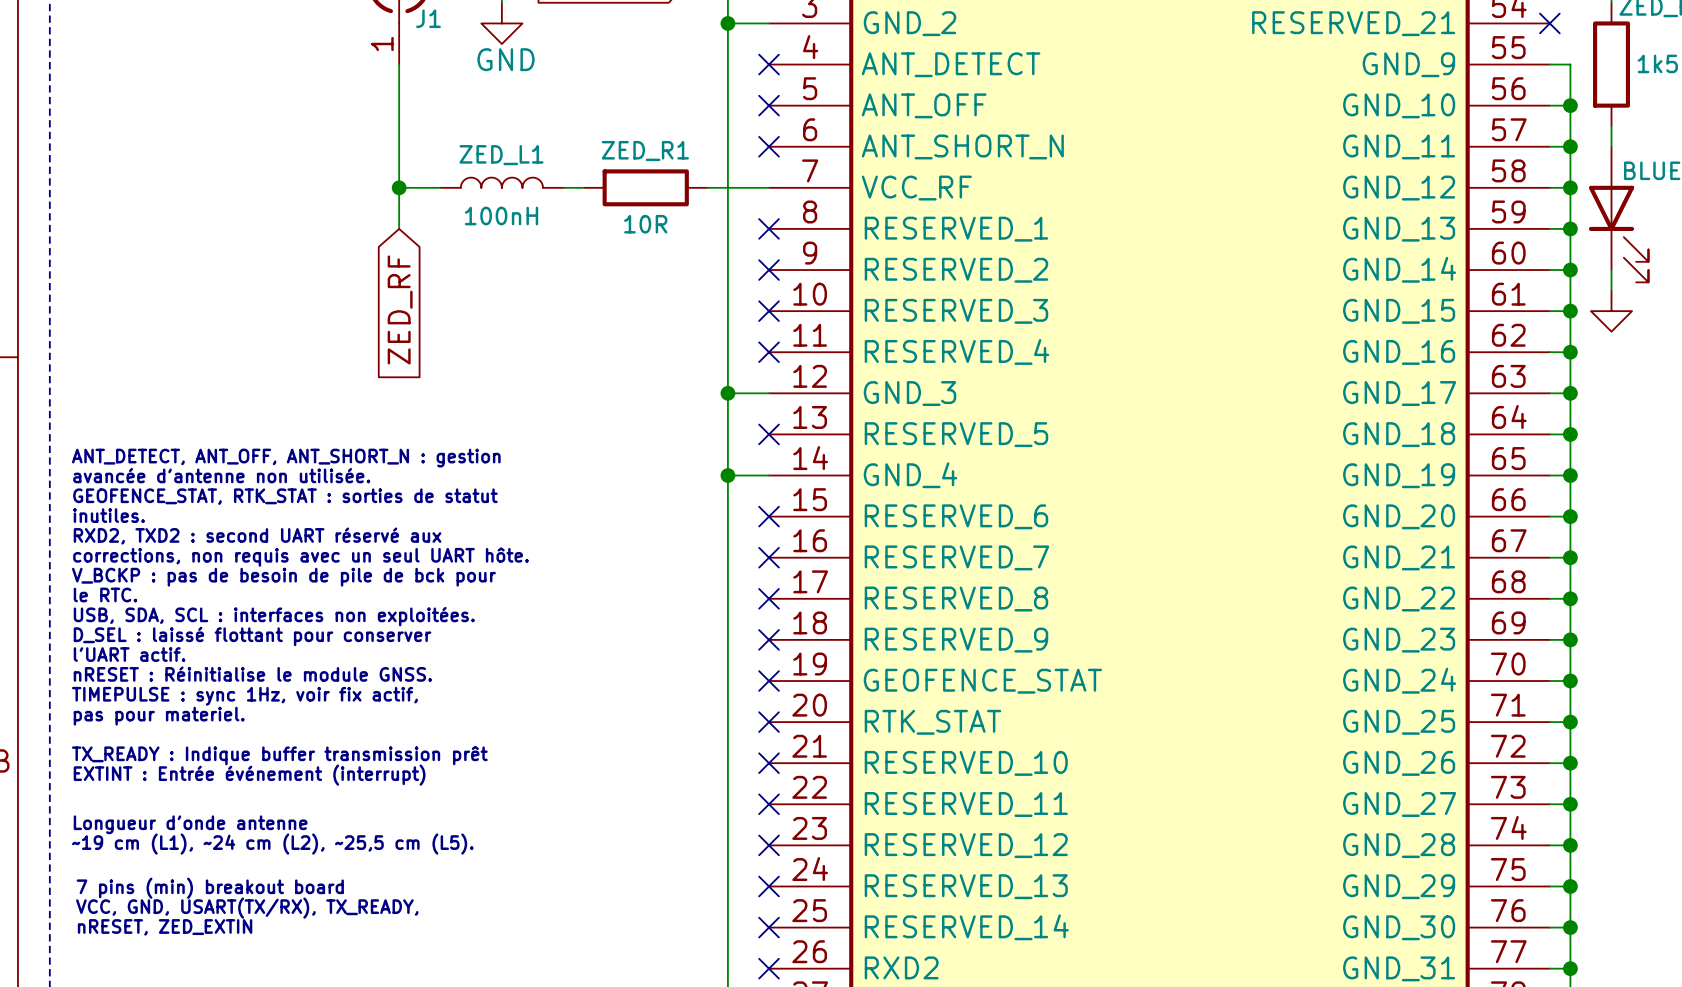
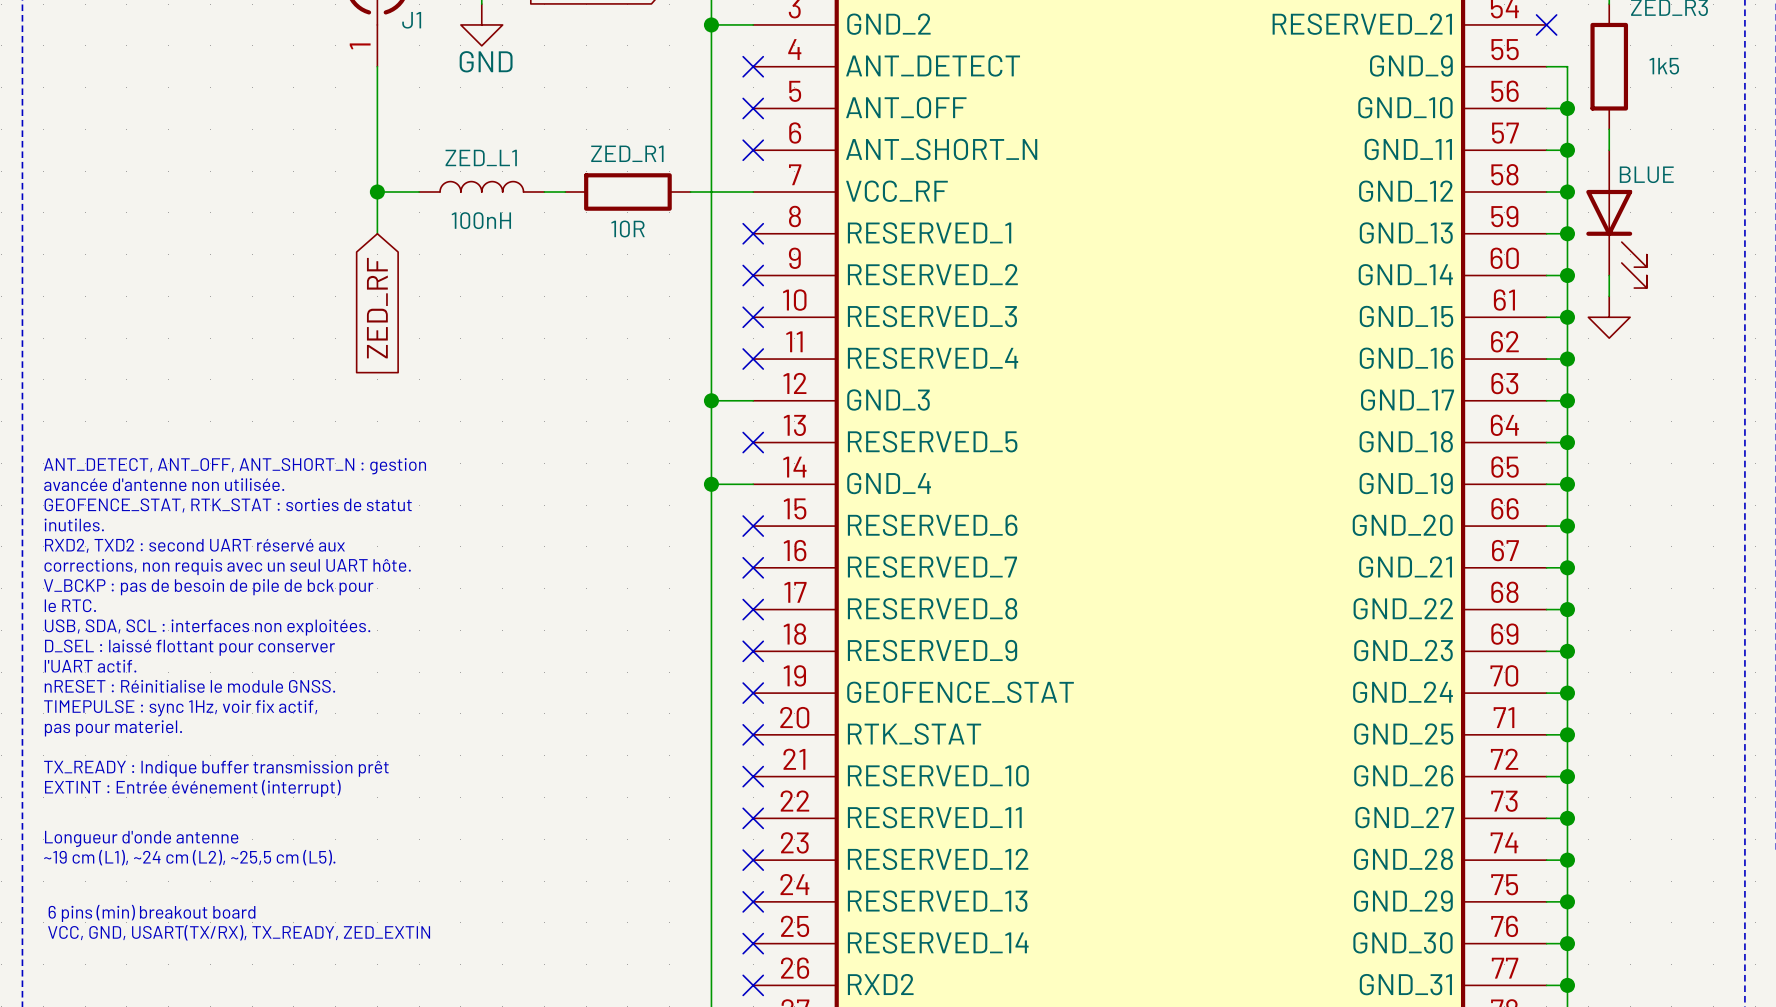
text: 7 pins (min) breakout board (210, 888) -> 6 pins (min) breakout board (152, 913)
text: VCC, GND, USART(TX/RX), TX_READY, (247, 908) -> VCC, GND, USART(TX/RX), TX_READY, ZED_EXTIN (239, 932)
text: nRESET, ZED_EXTIN (165, 927) -> none

